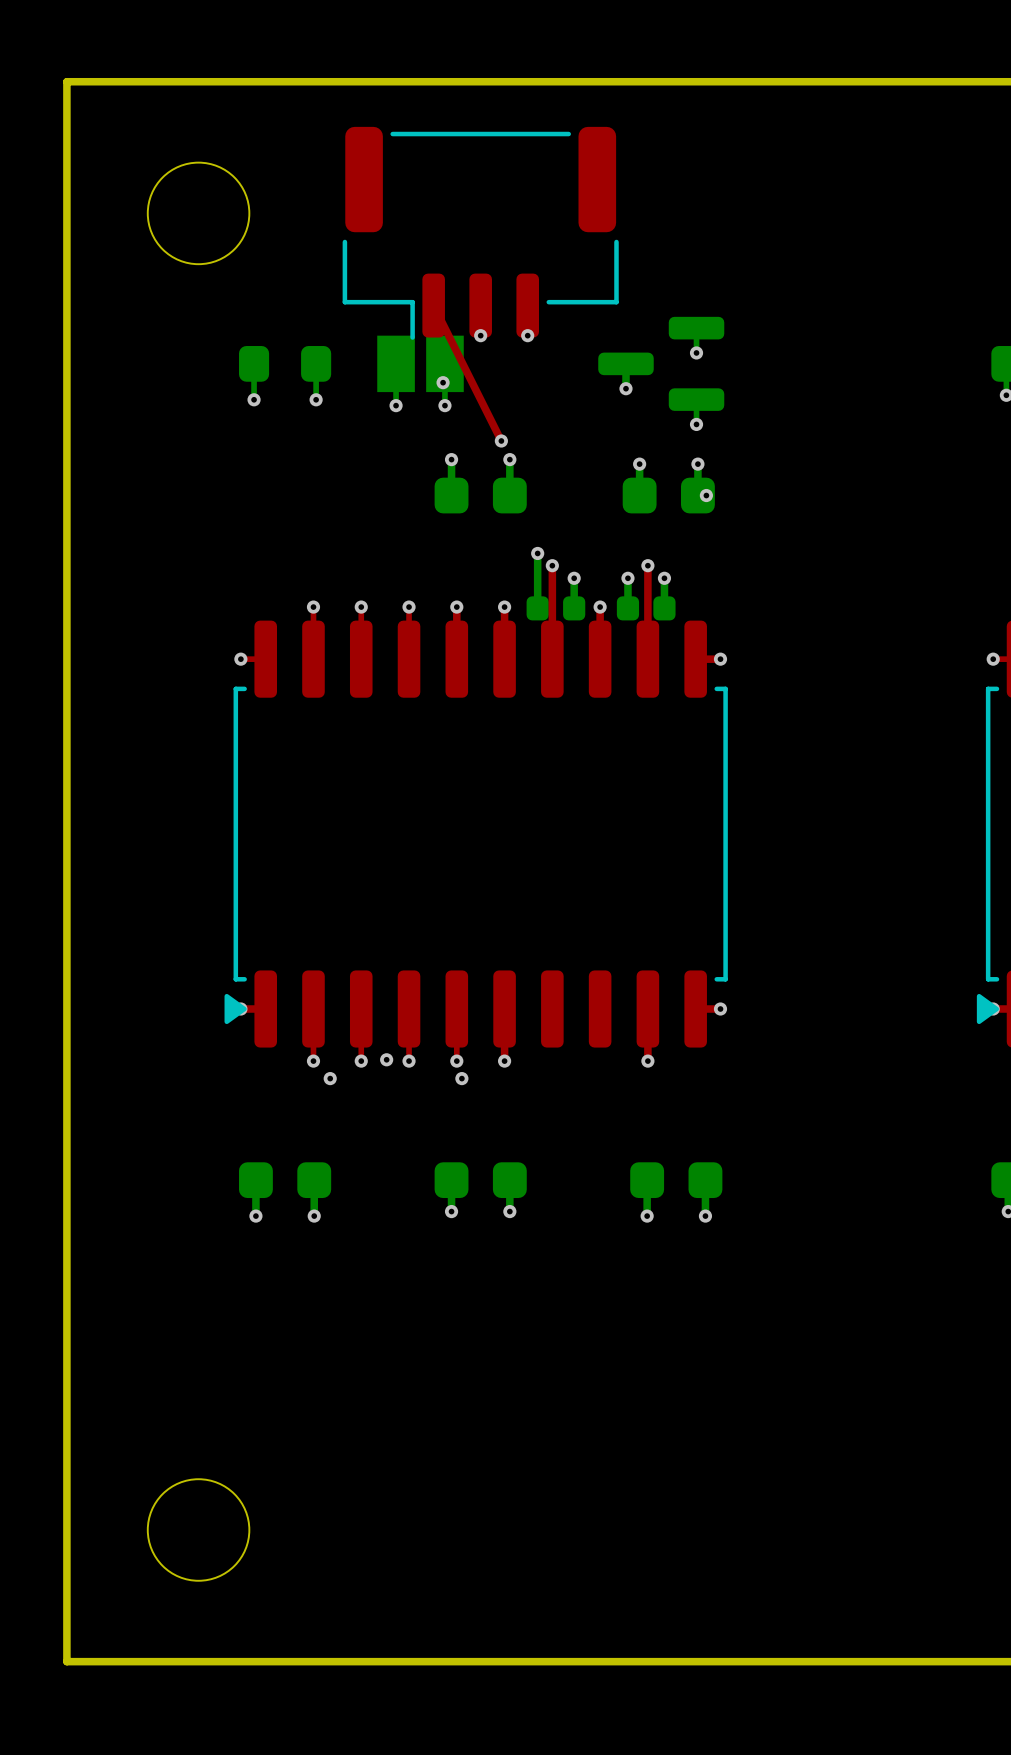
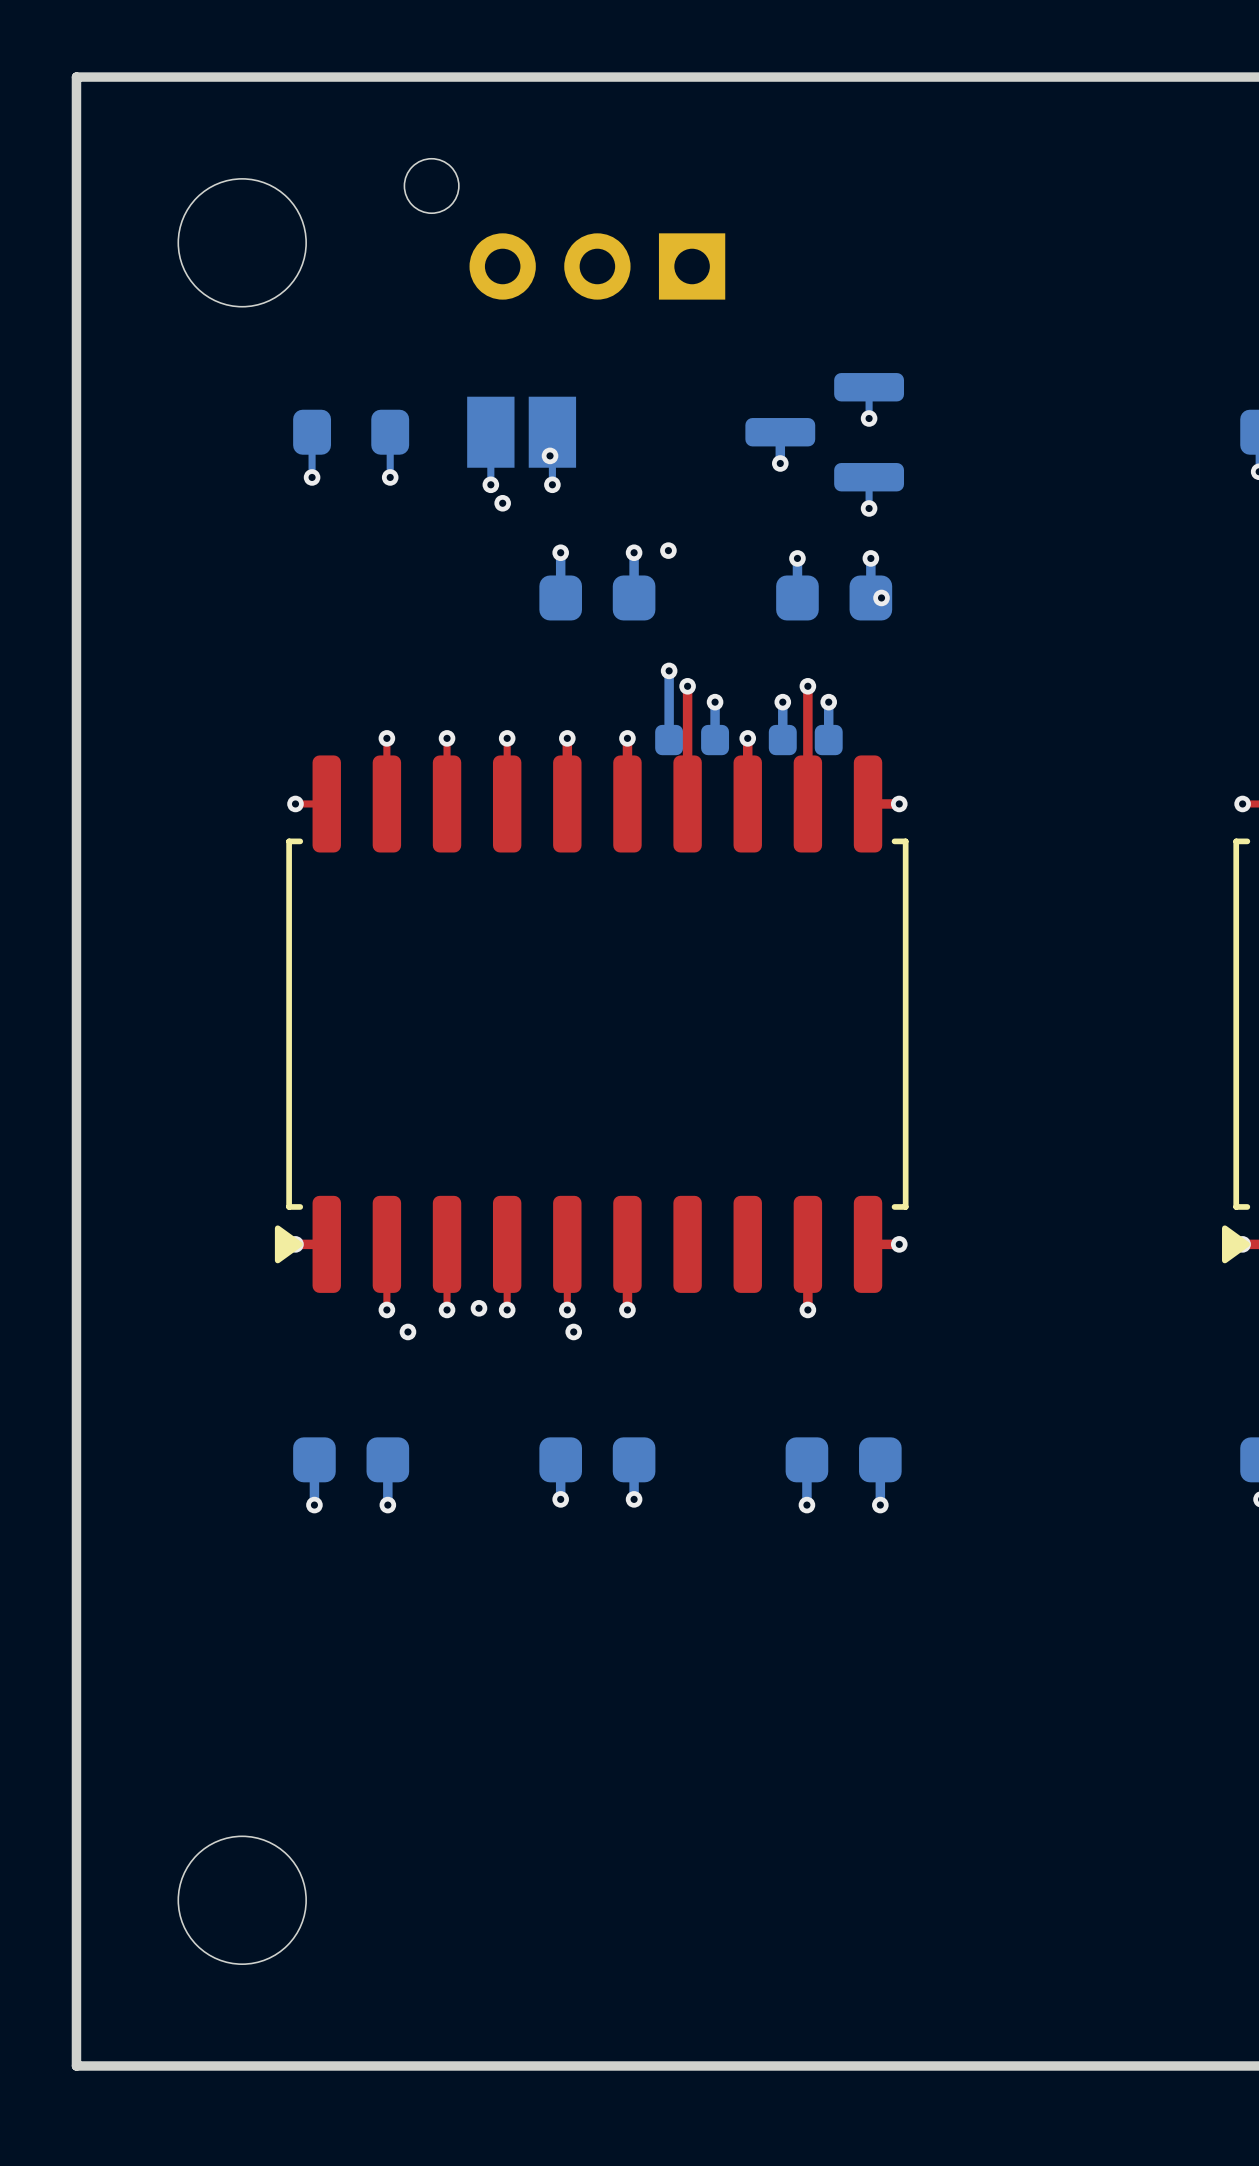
part: none -> (564, 229)
part: (480, 233) -> none
top track: (433, 305) (501, 440) -> none
via: (480, 335) -> none
via: (527, 335) -> none
via: none -> (502, 503)
via position: (501, 440) -> (668, 550)

